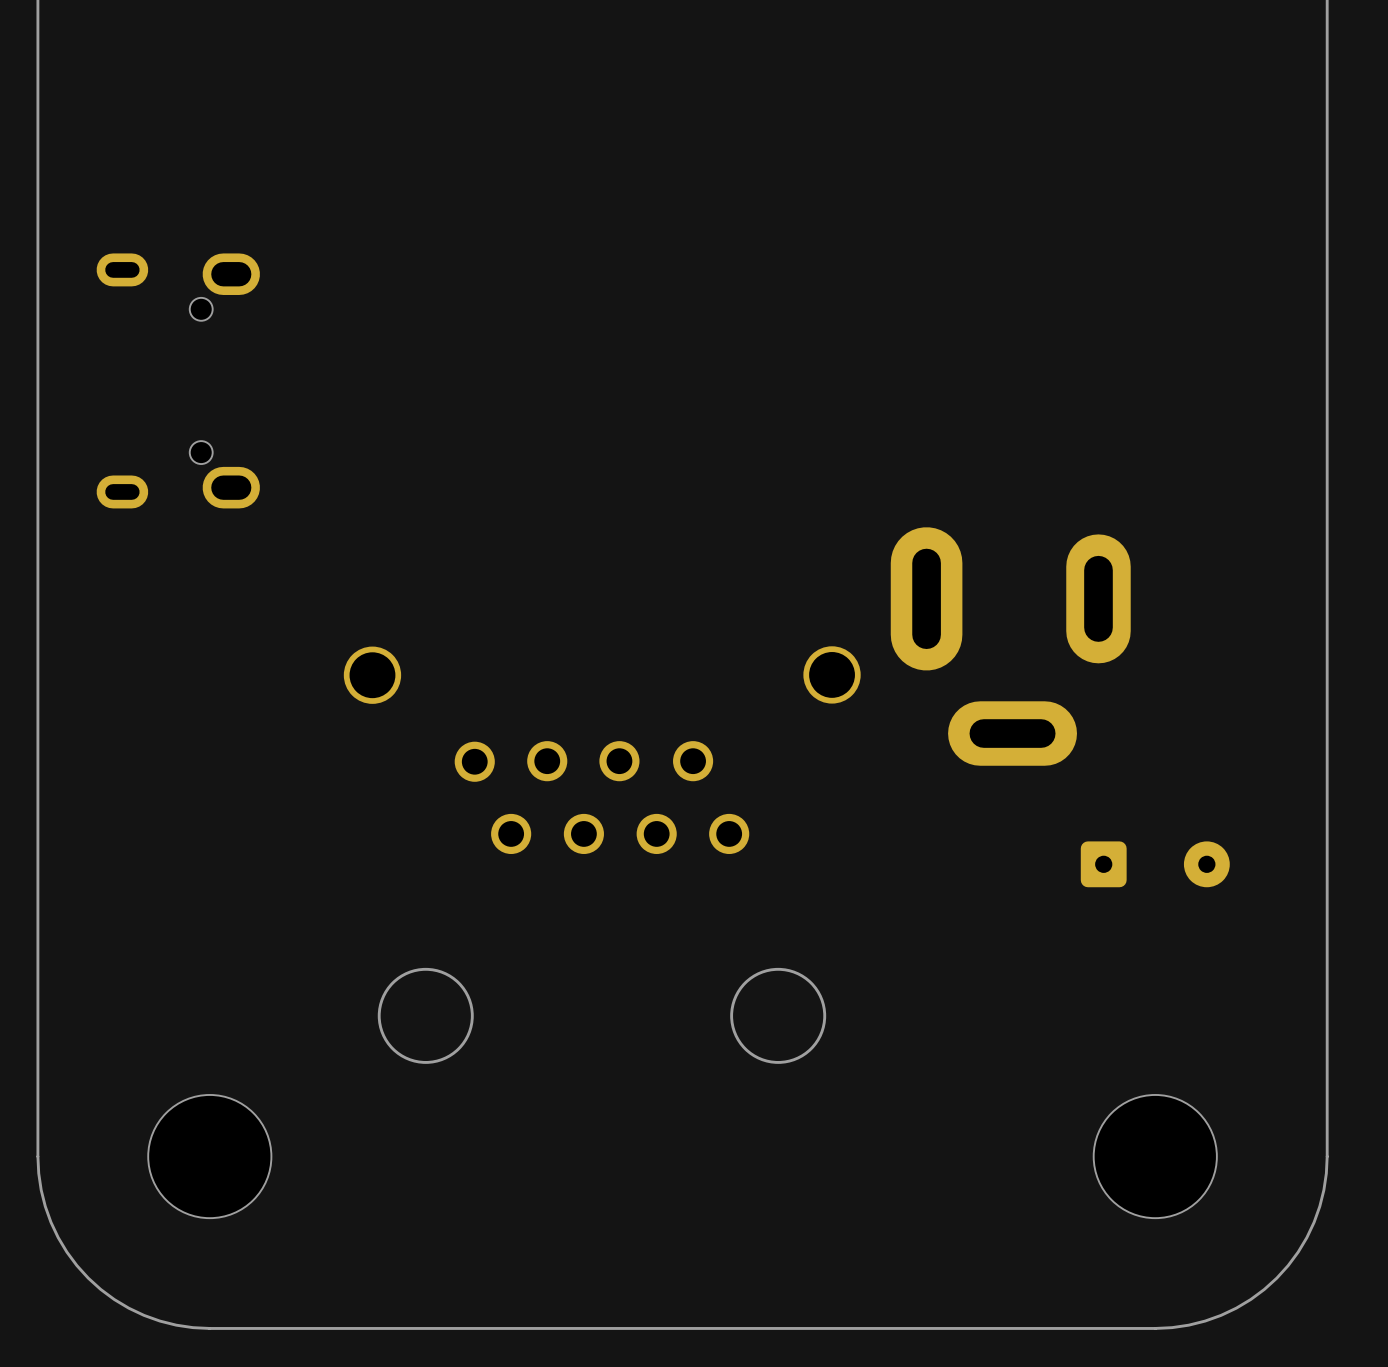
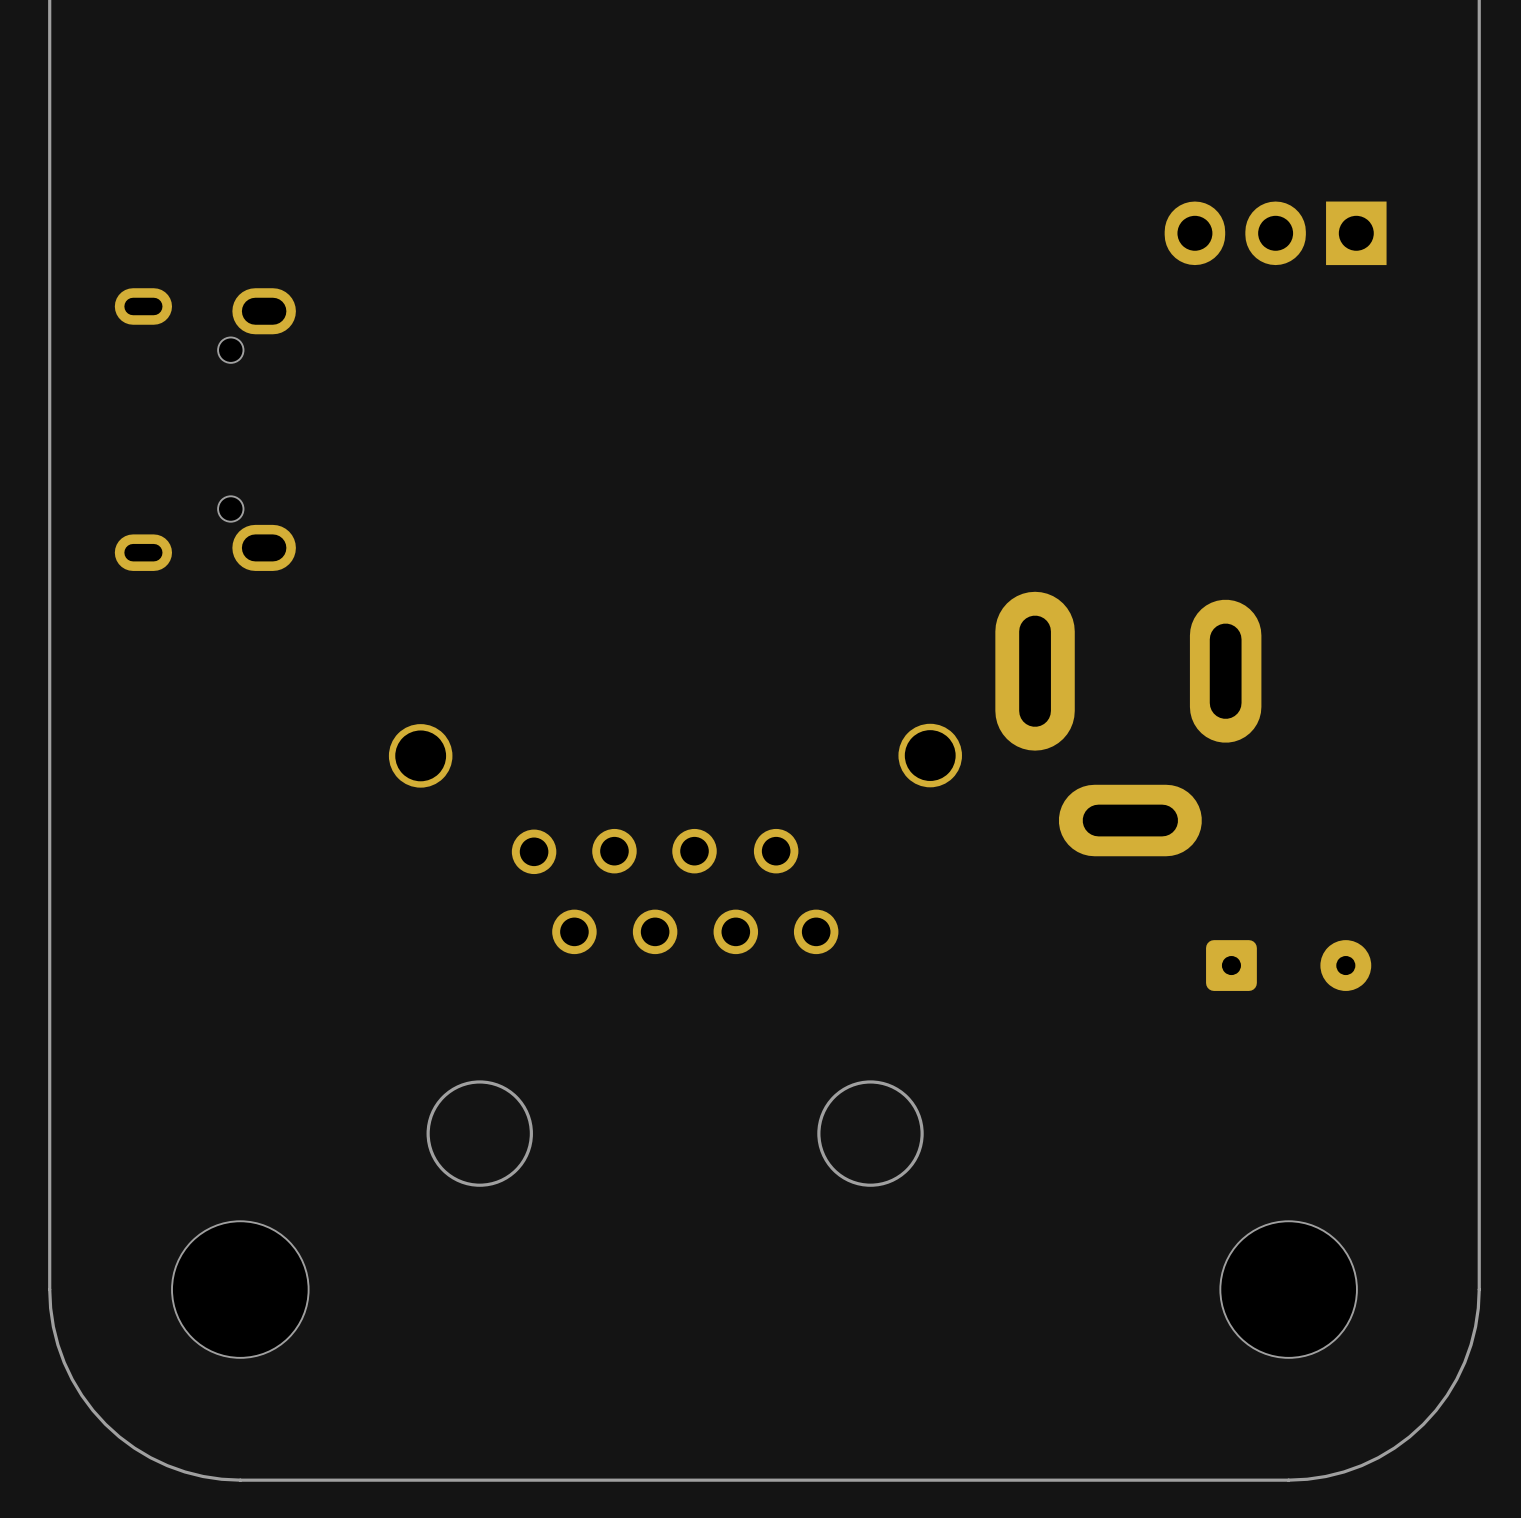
part: none -> (1275, 233)

